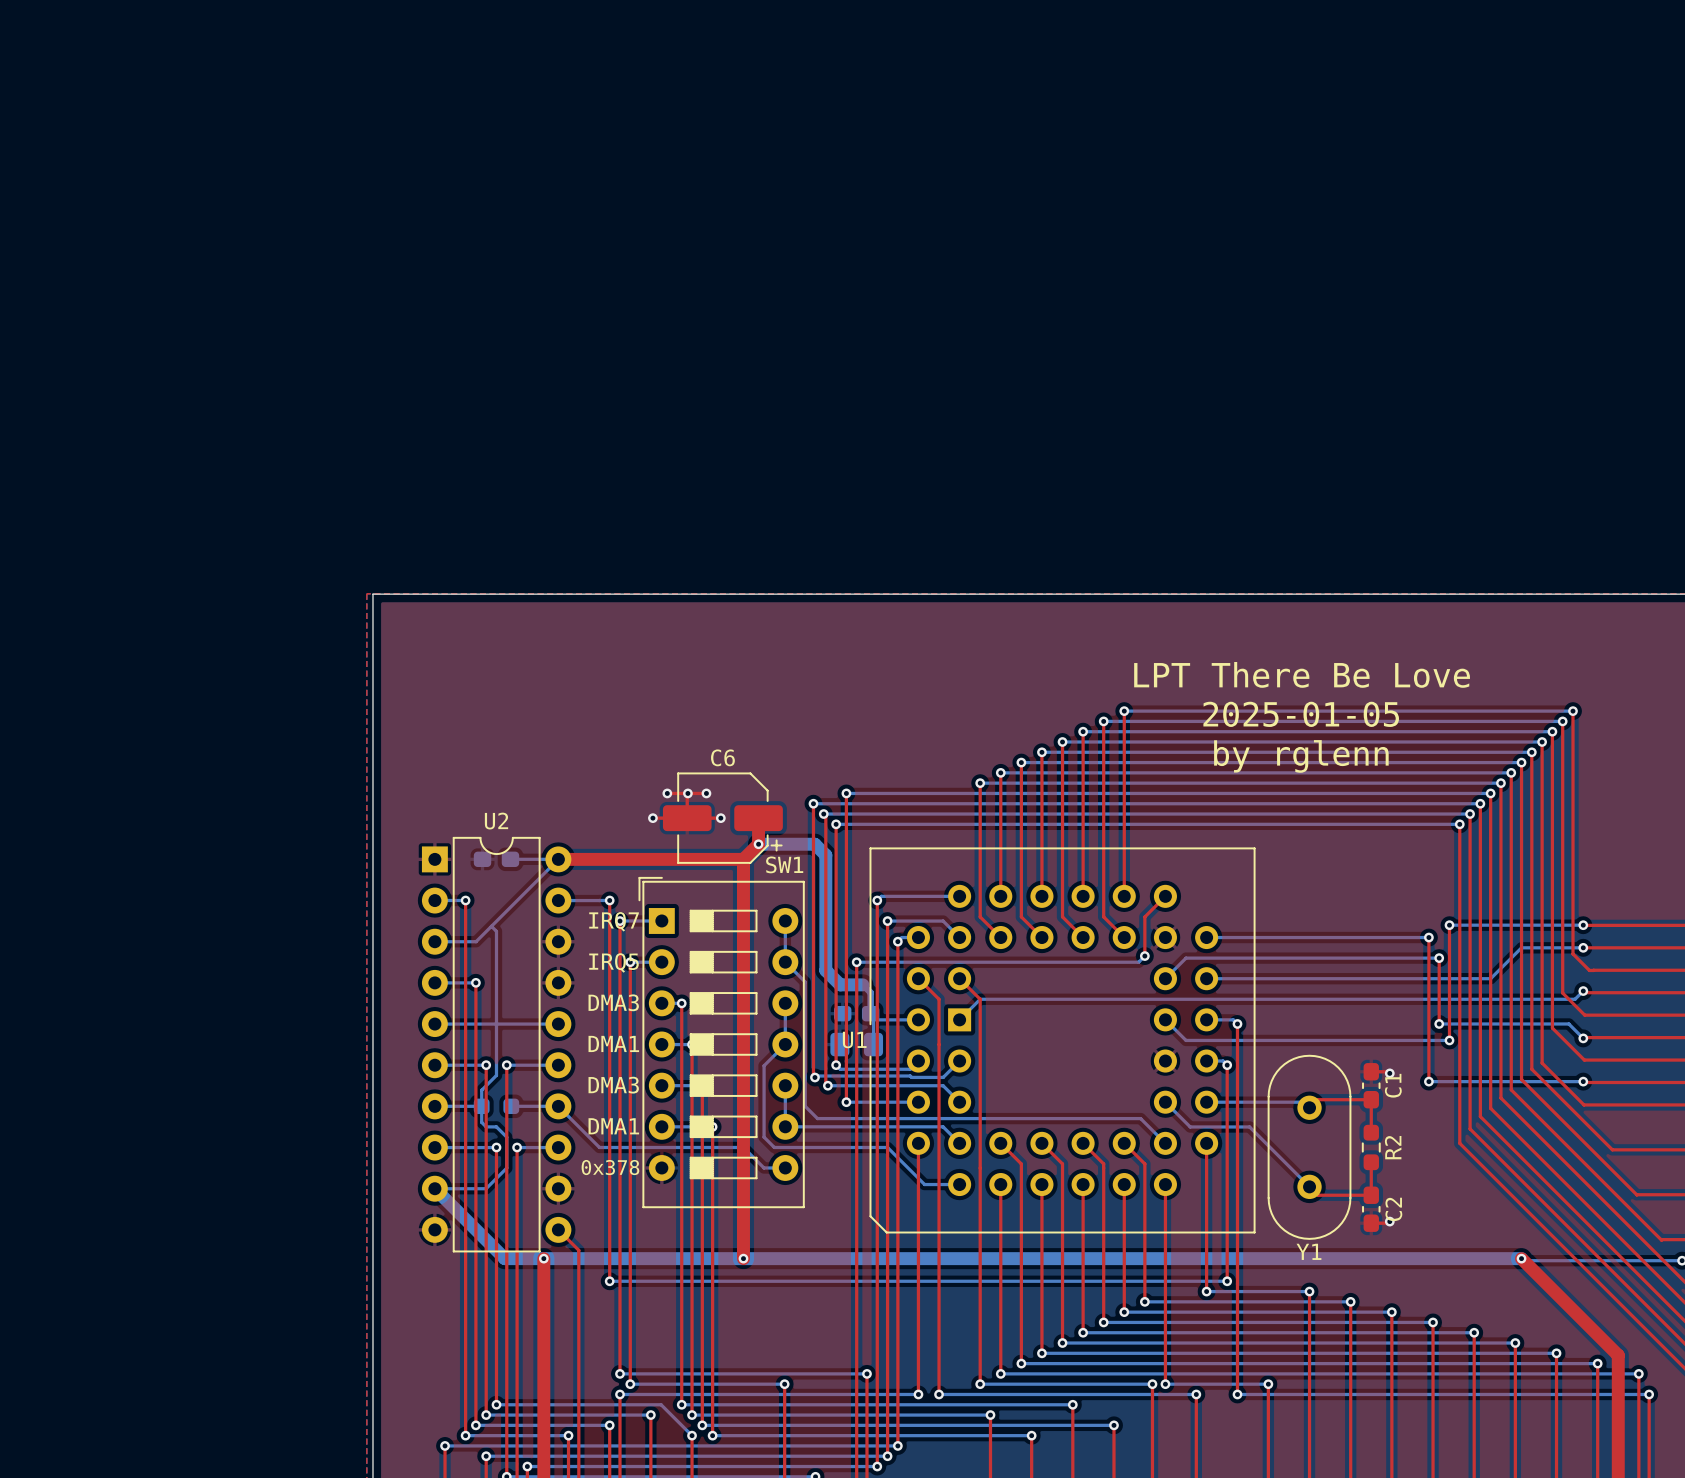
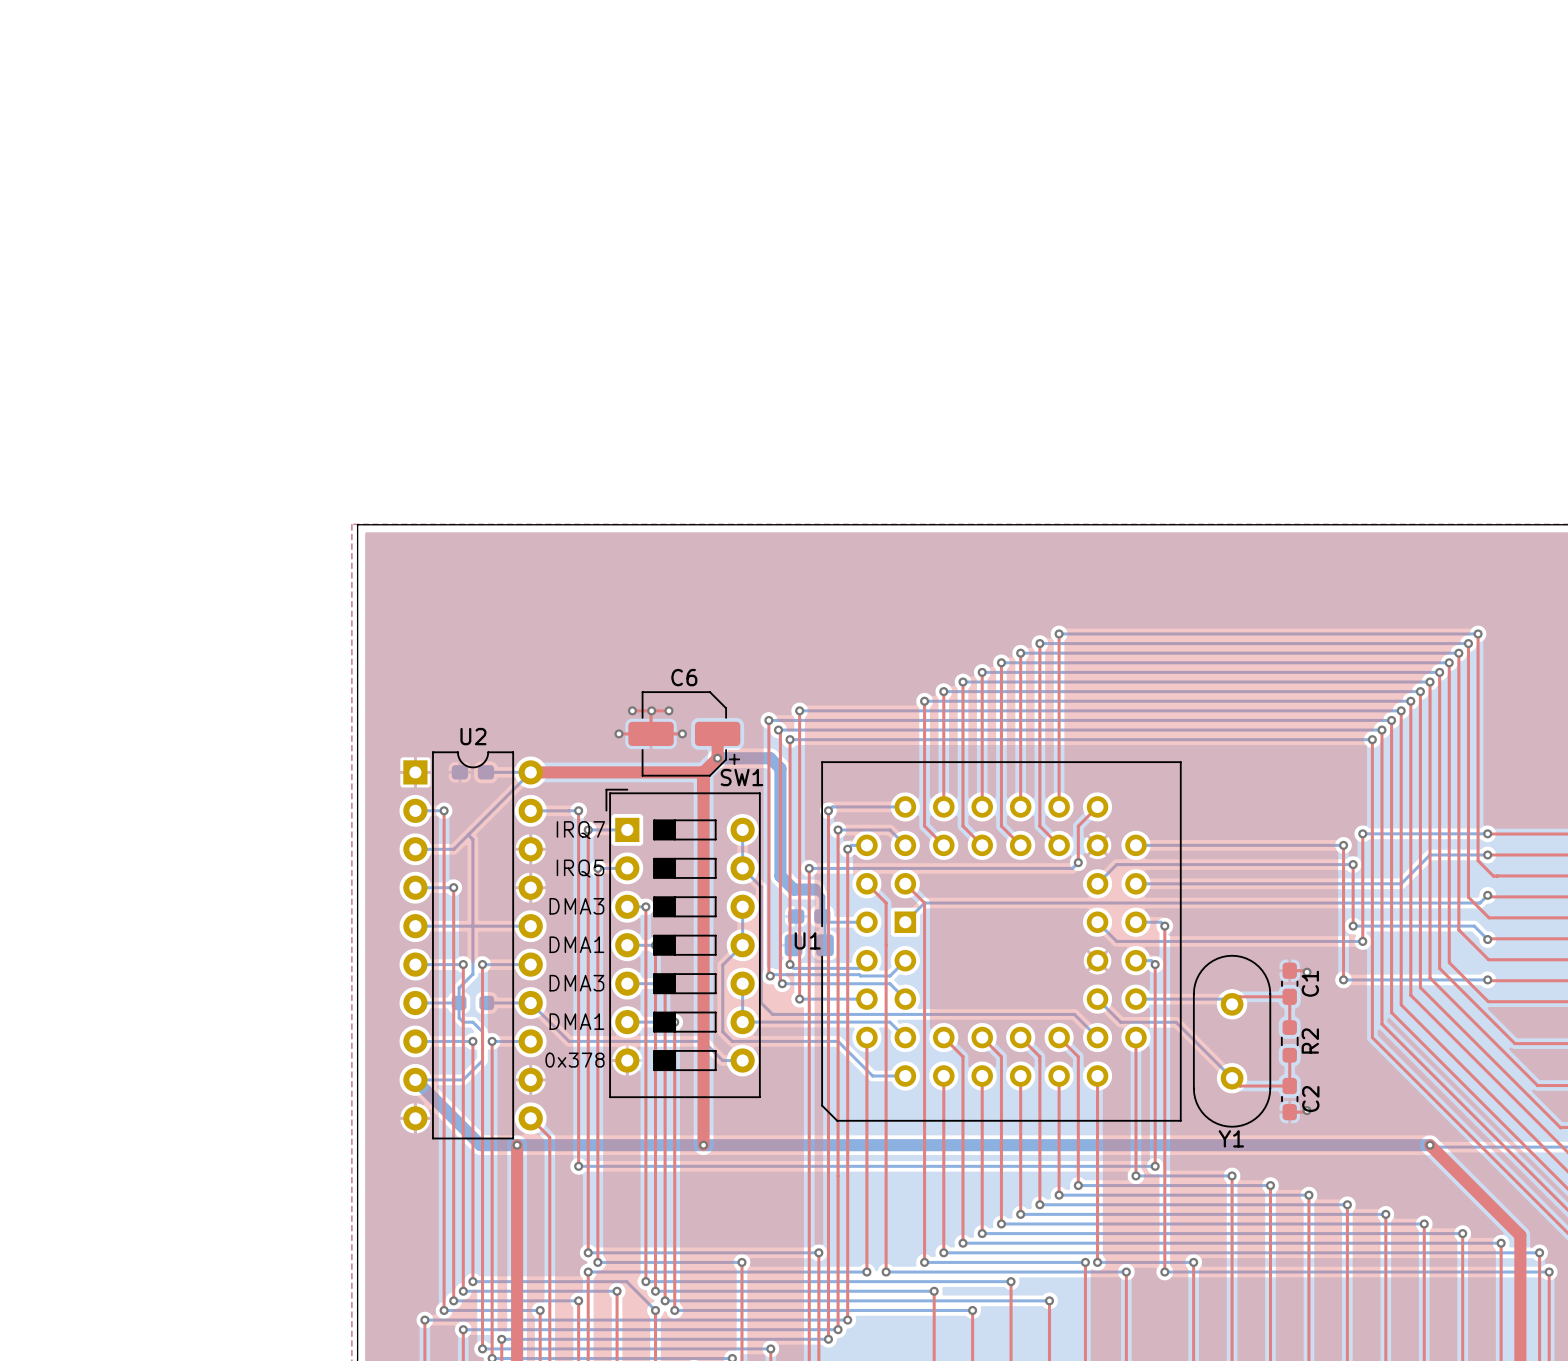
text: LPT There Be Love (1302, 674) -> none
text: 2025-01-05 (1301, 714) -> none
text: by rglenn (1301, 756) -> none

